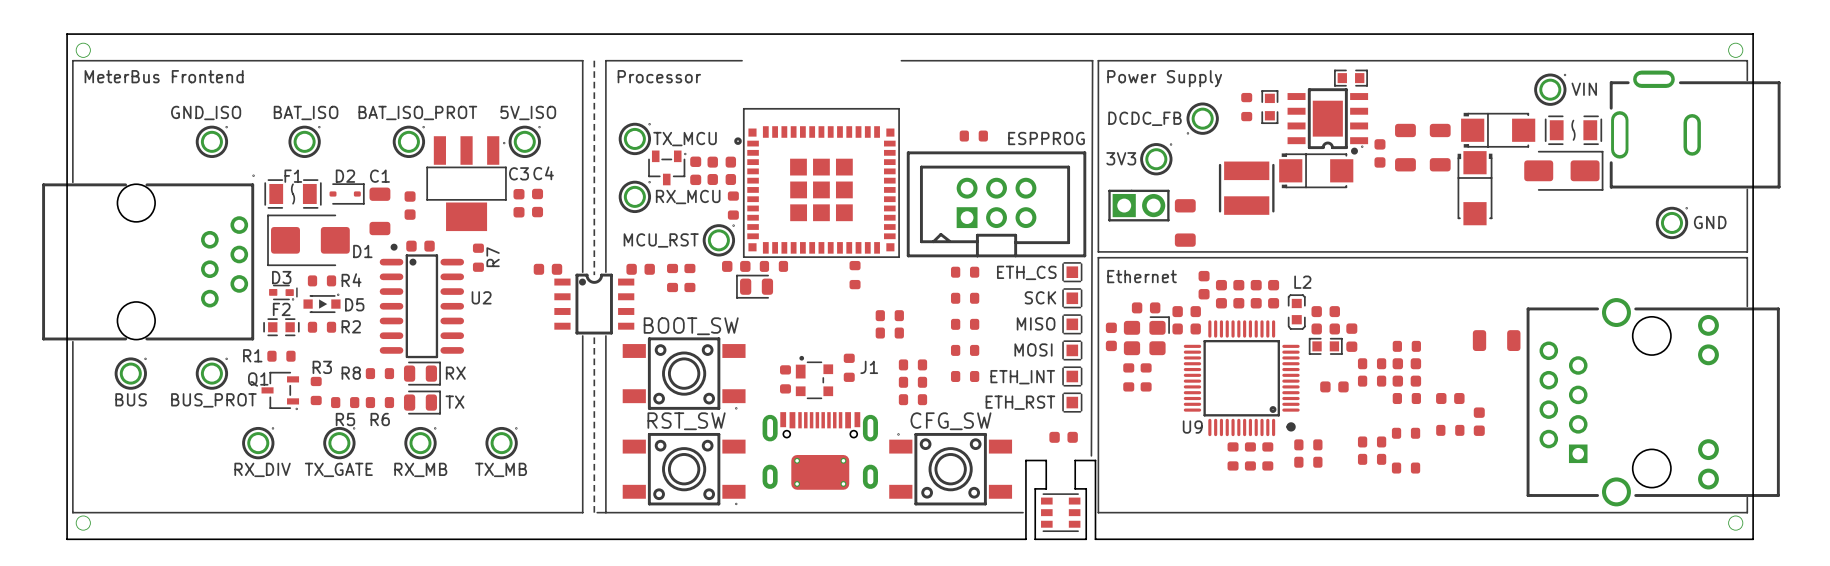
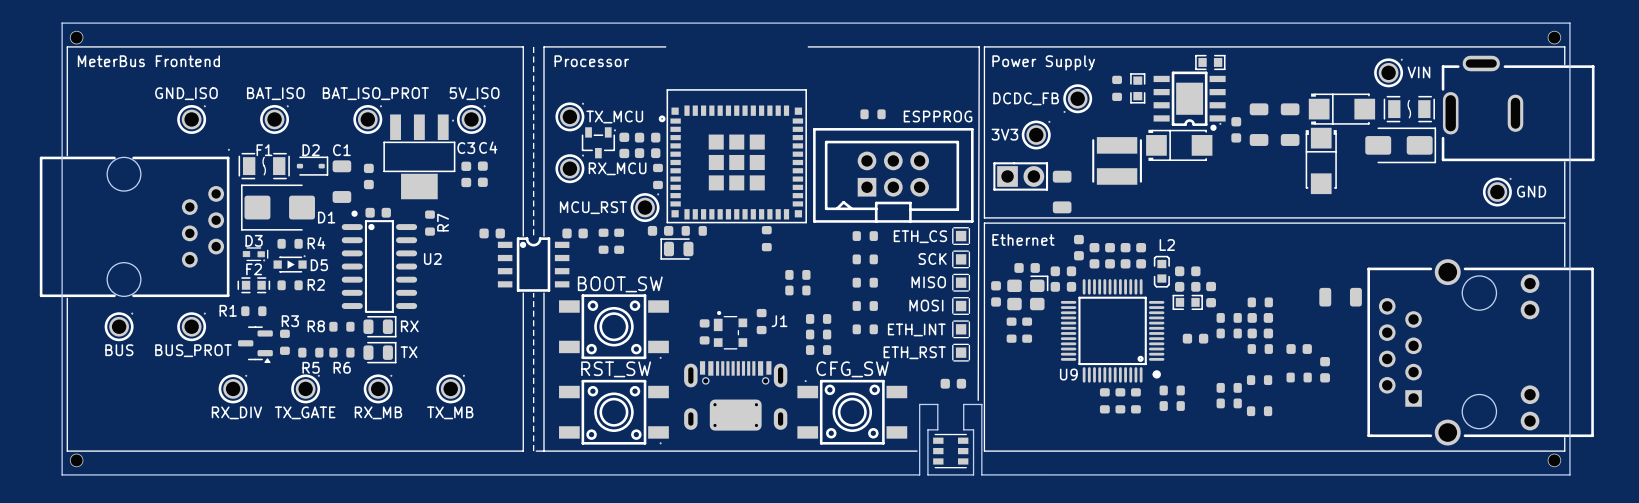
Q1: (280, 390) -> none
part: none -> (255, 344)

